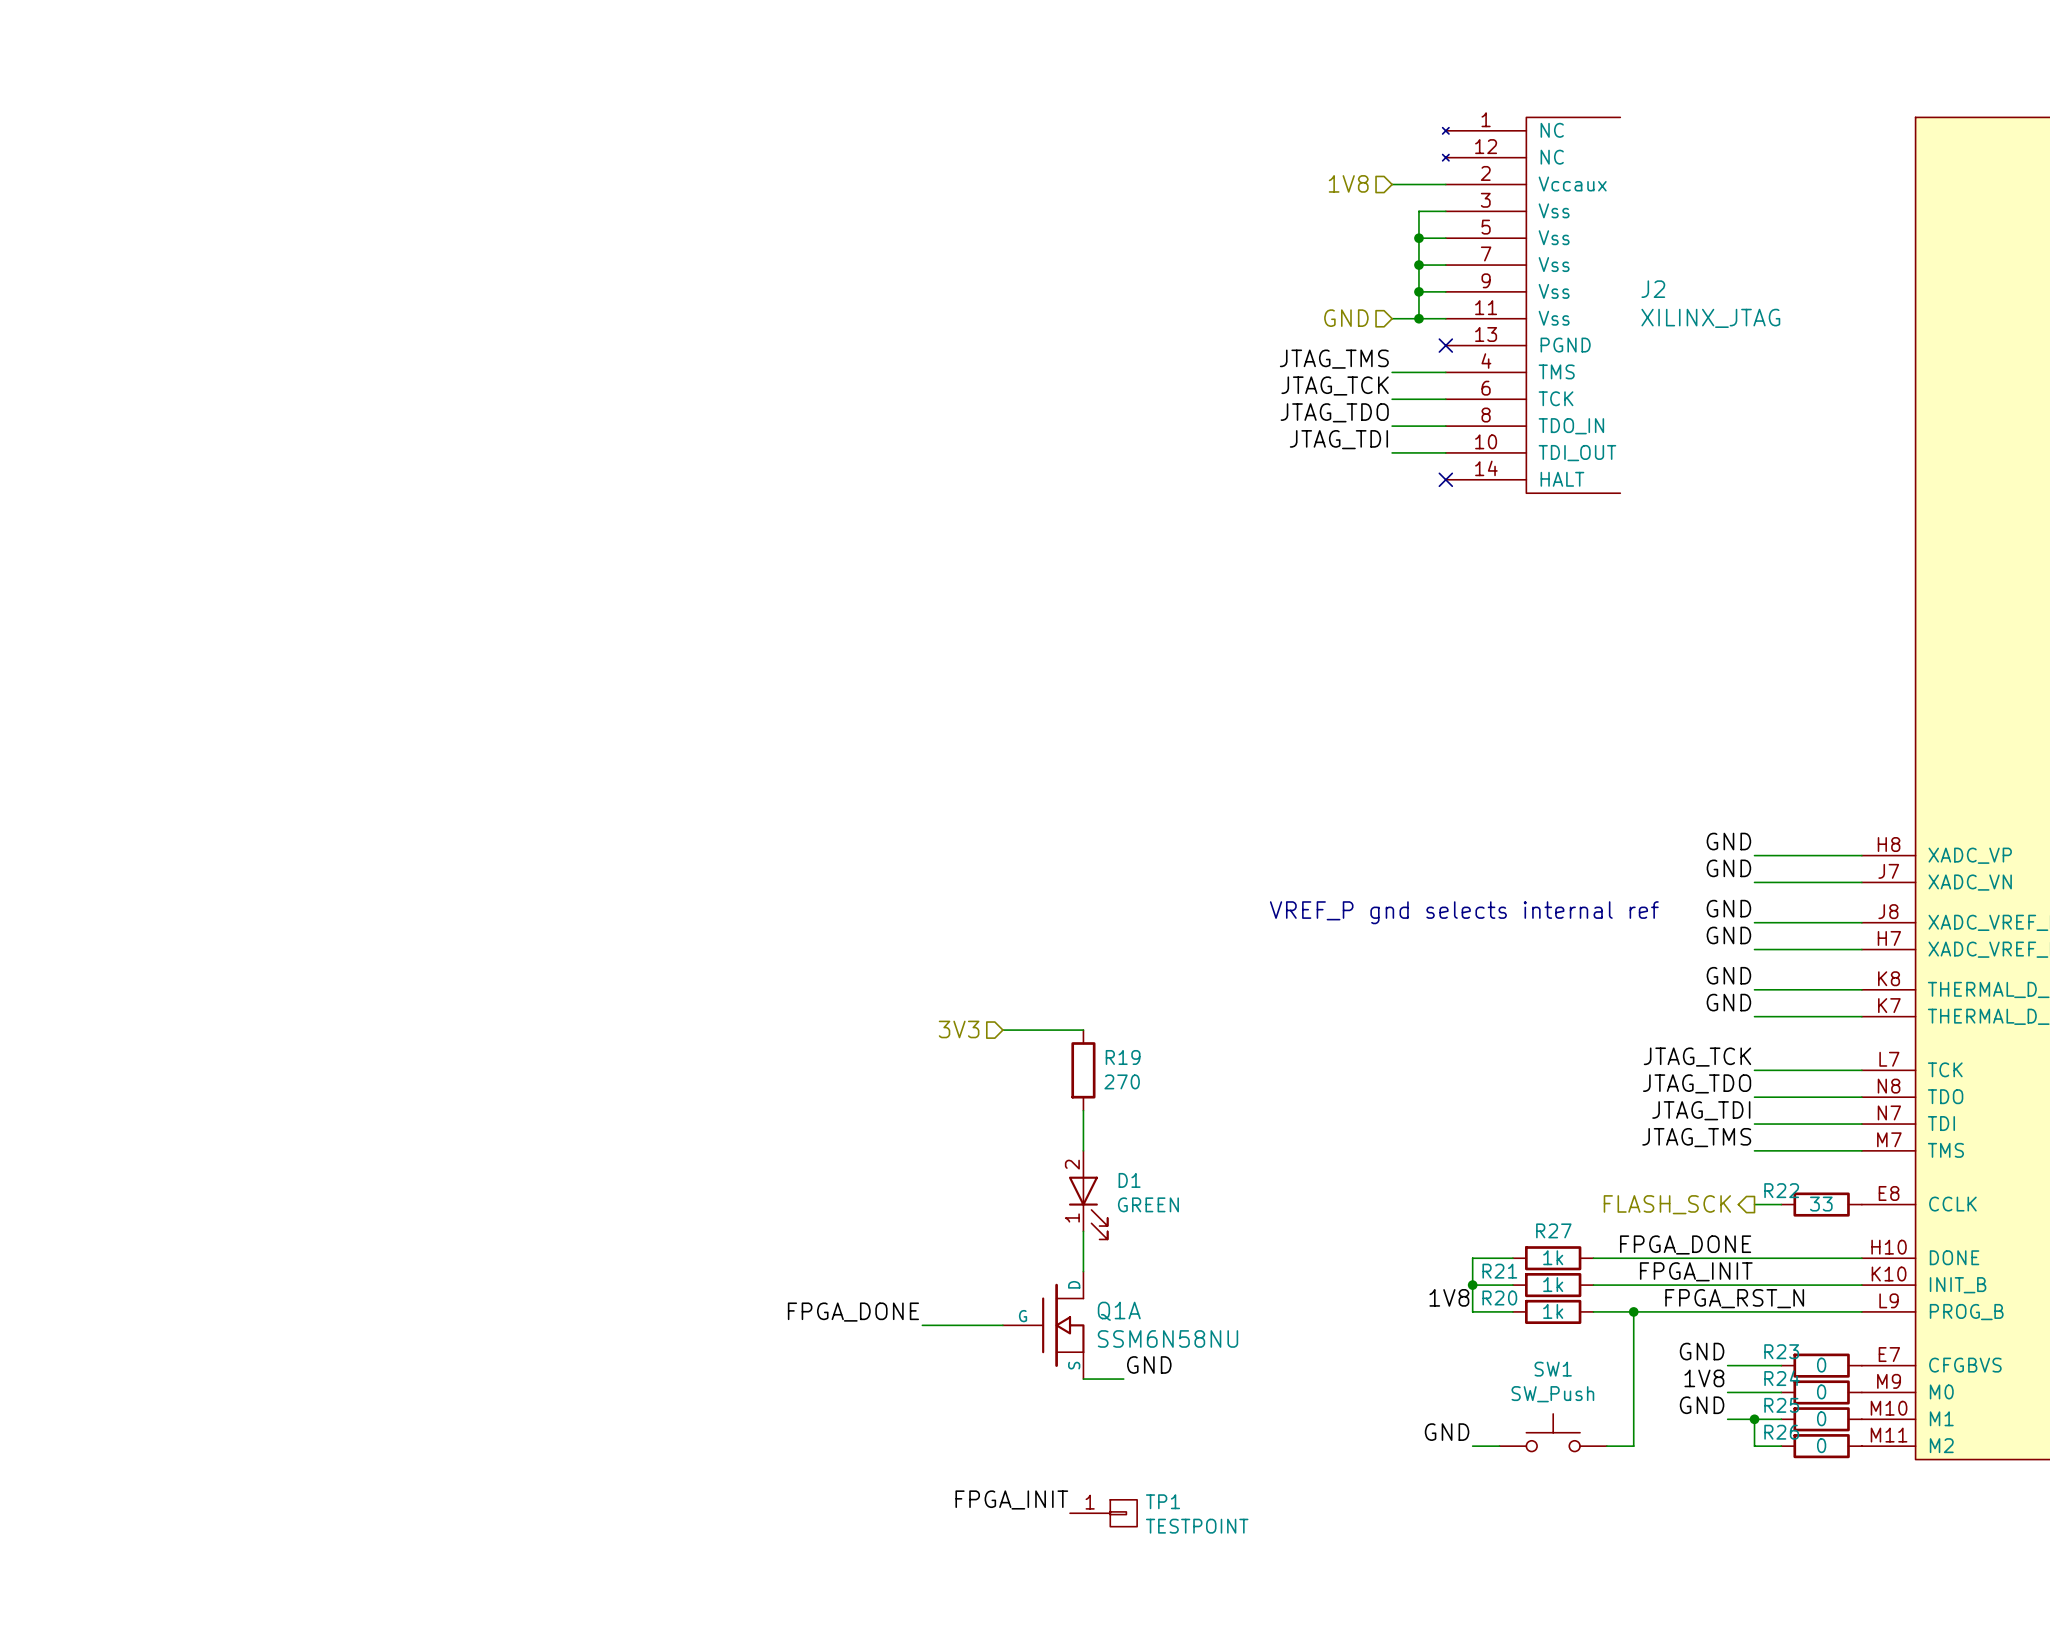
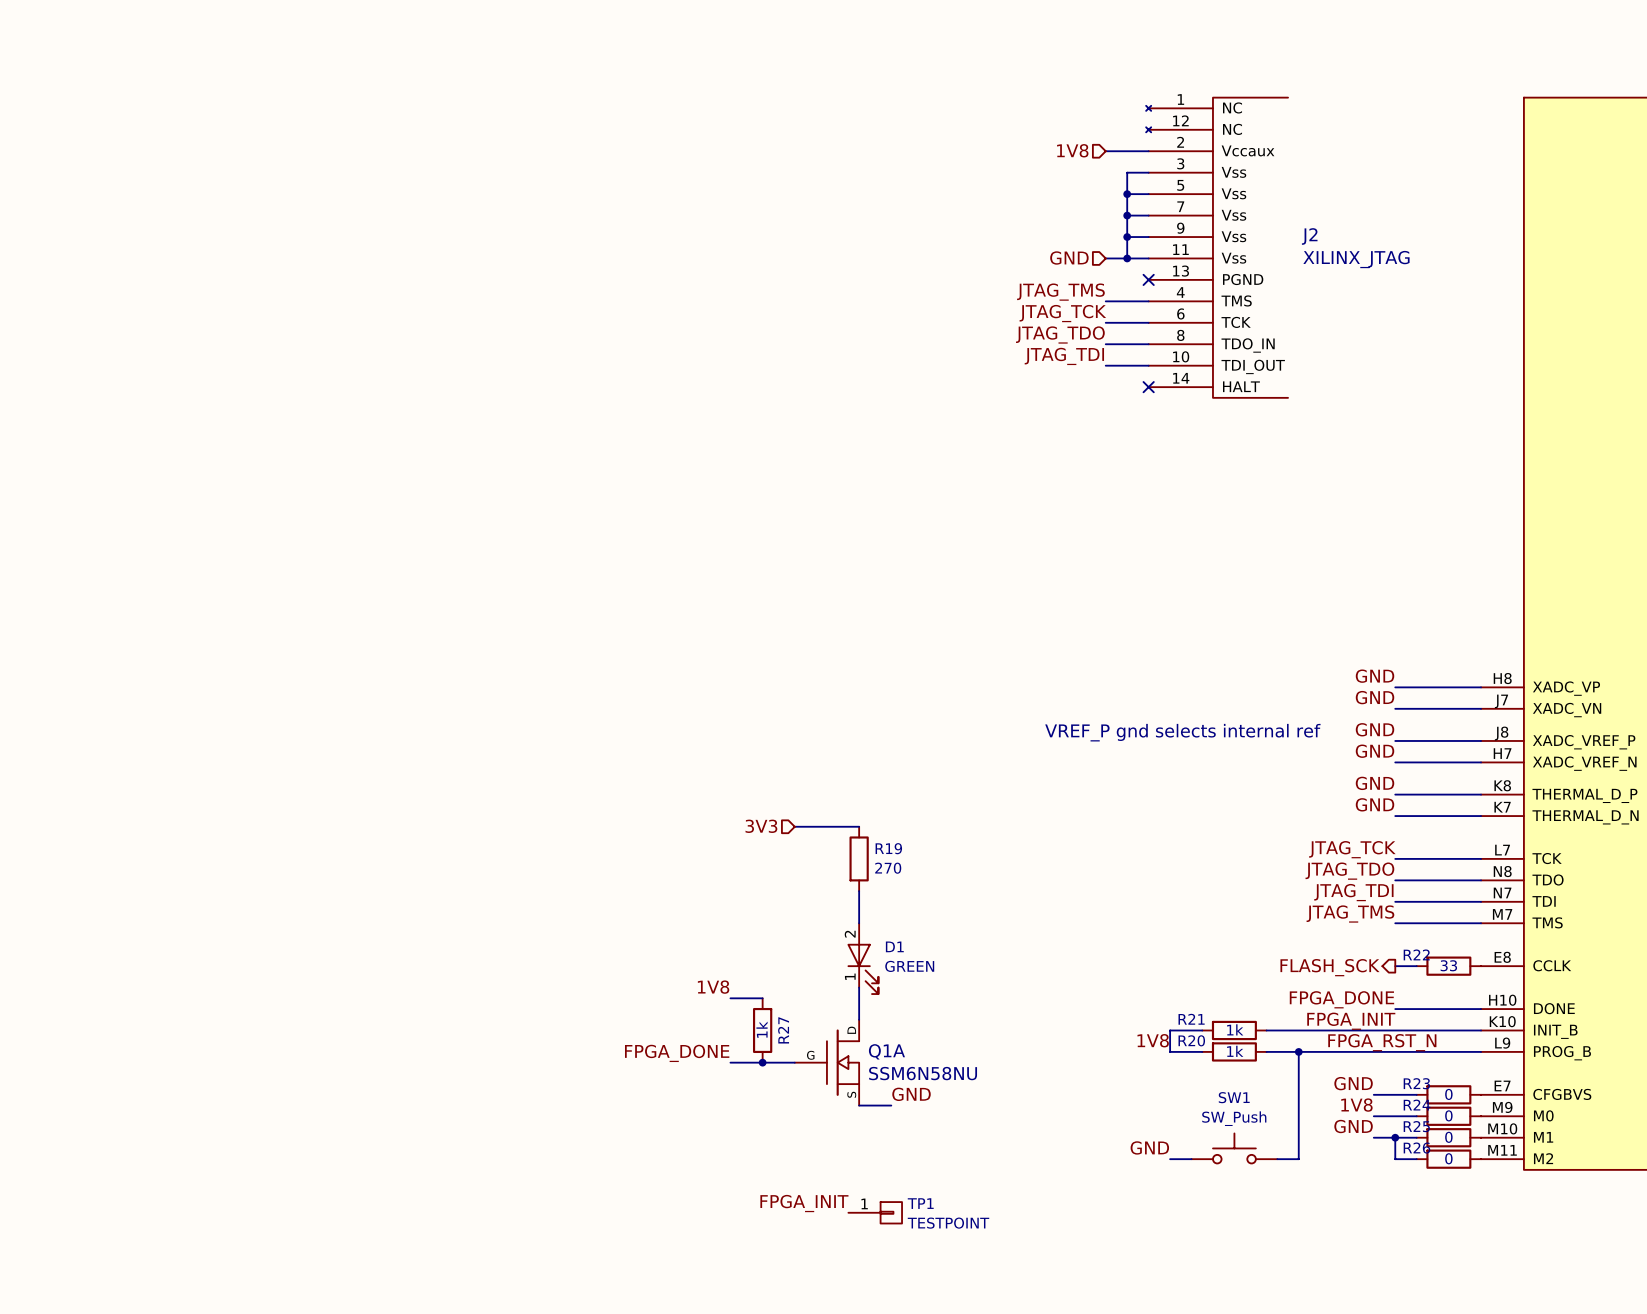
label: none -> 1V8 (713, 987)
wire: none -> (730, 998) (762, 998)
wire: (1512, 1258) (1472, 1258) (1472, 1285) -> none
R27 rotation: 0° (1553, 1258) -> 90° clockwise (762, 1030)
R27 position: (1553, 1258) -> (762, 1030)
wire: (1593, 1258) (1754, 1258) -> none
junction: (1472, 1285) -> none
junction: none -> (762, 1062)

